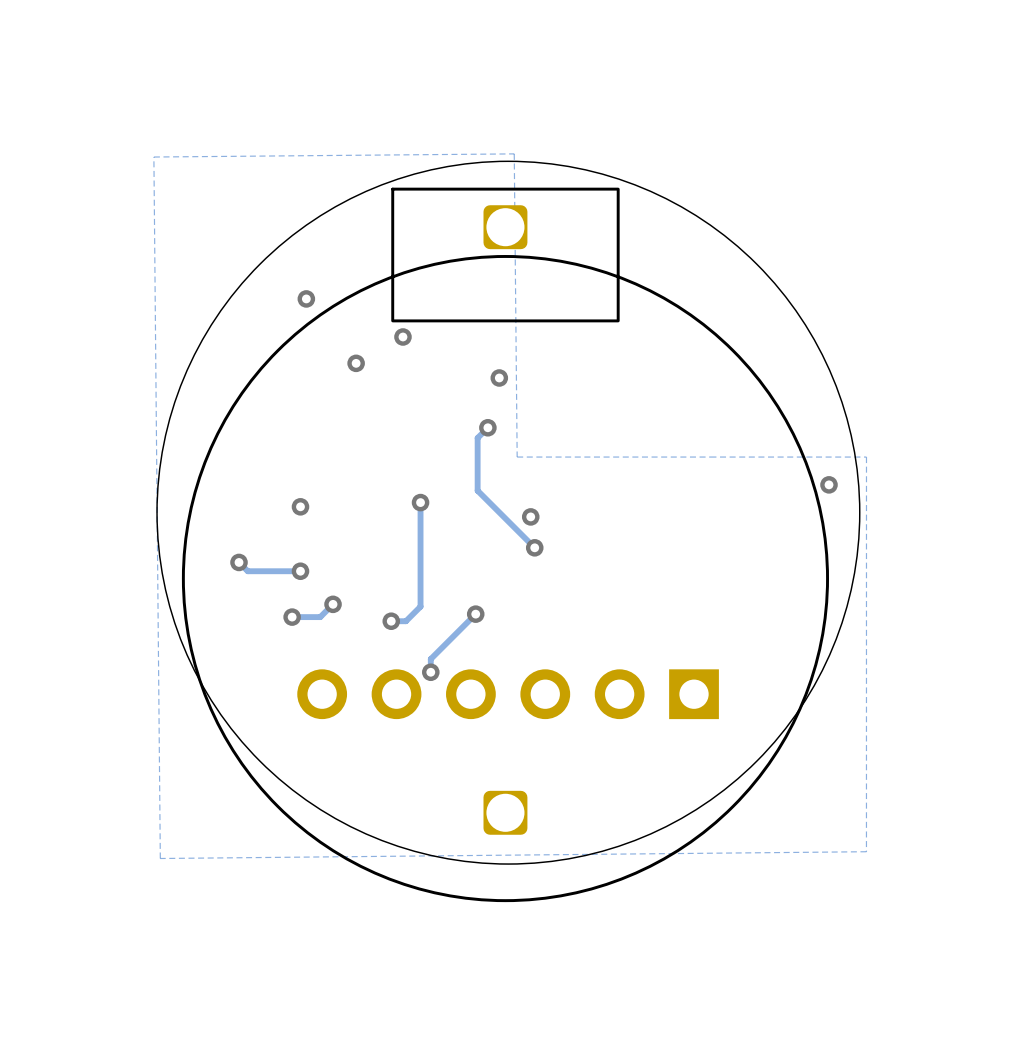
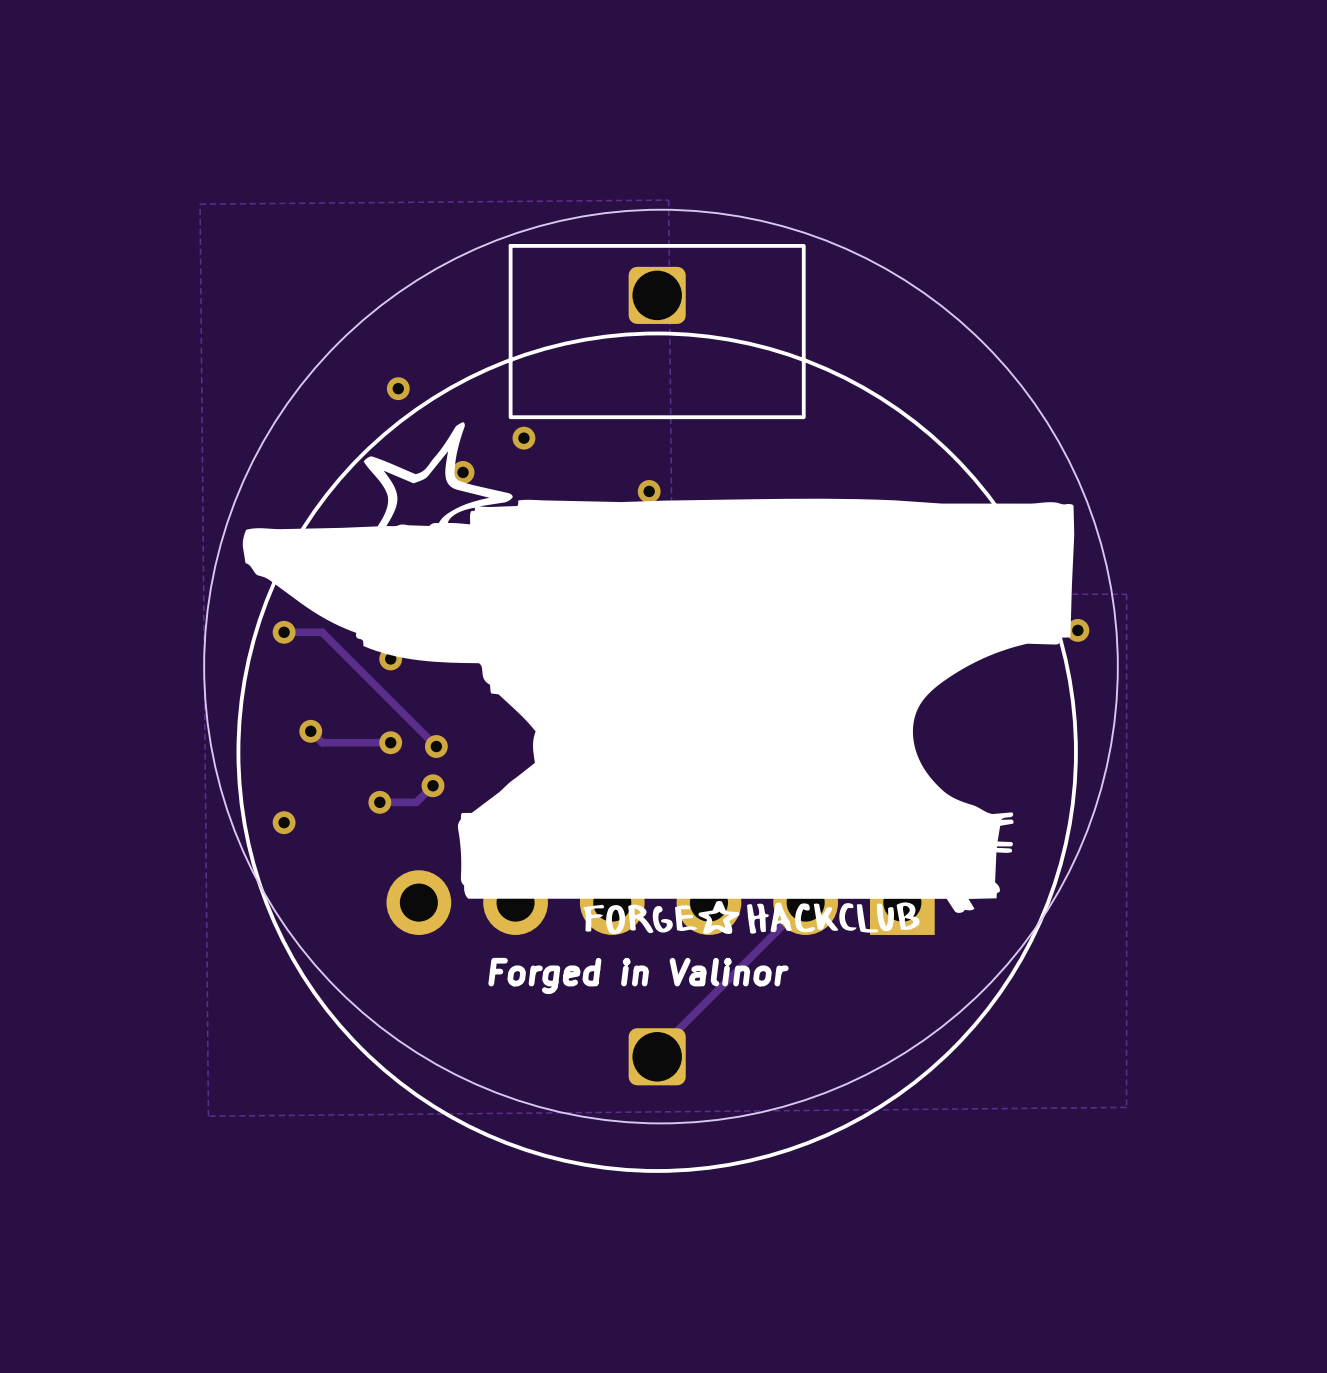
drawing: none -> [242, 422, 1075, 934]
track: none -> (284, 632) (322, 632) (436, 746)
via: none -> (284, 632)
via: none -> (436, 746)
via: none -> (284, 822)
track: none -> (805, 902) (657, 1051)
text: none -> Forged in Valinor (638, 975)

